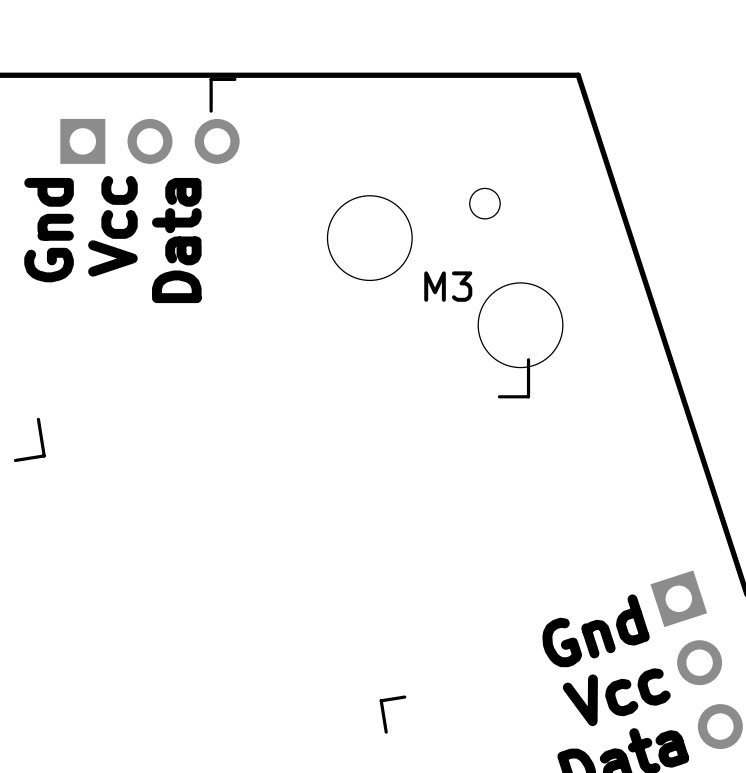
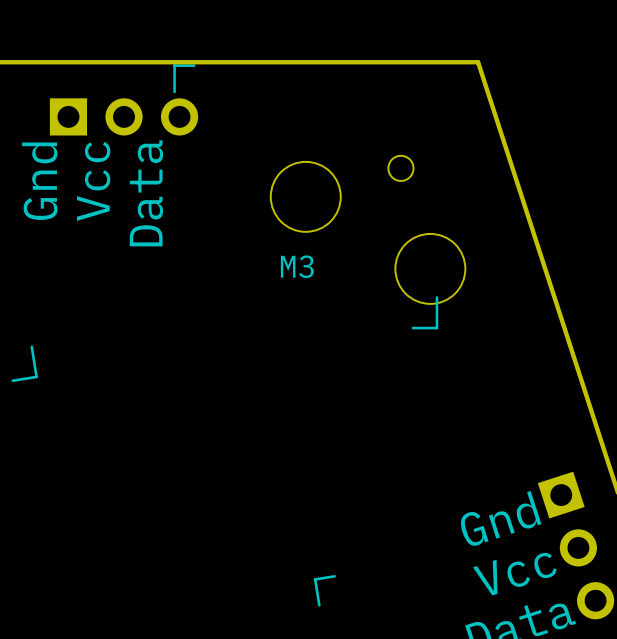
M3 name position: M3 (448, 286) -> M3 (297, 266)

